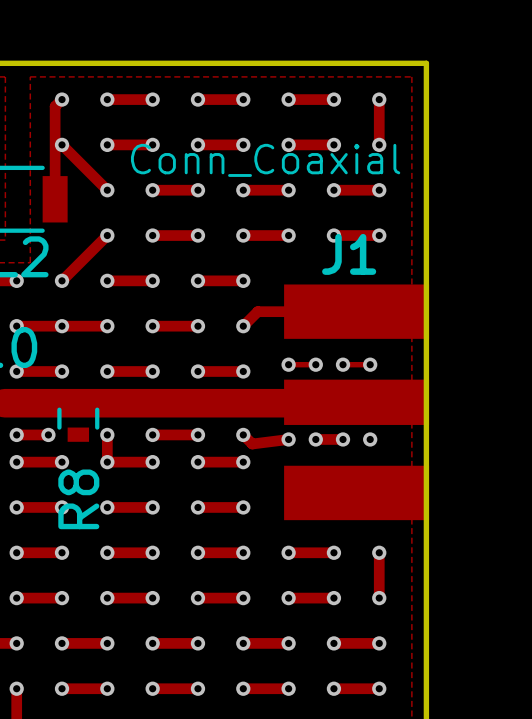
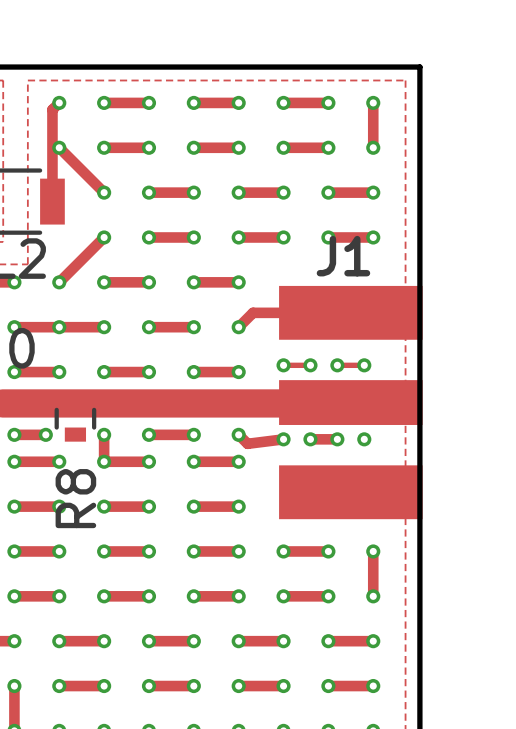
J1 value: Conn_Coaxial (265, 160) -> none

